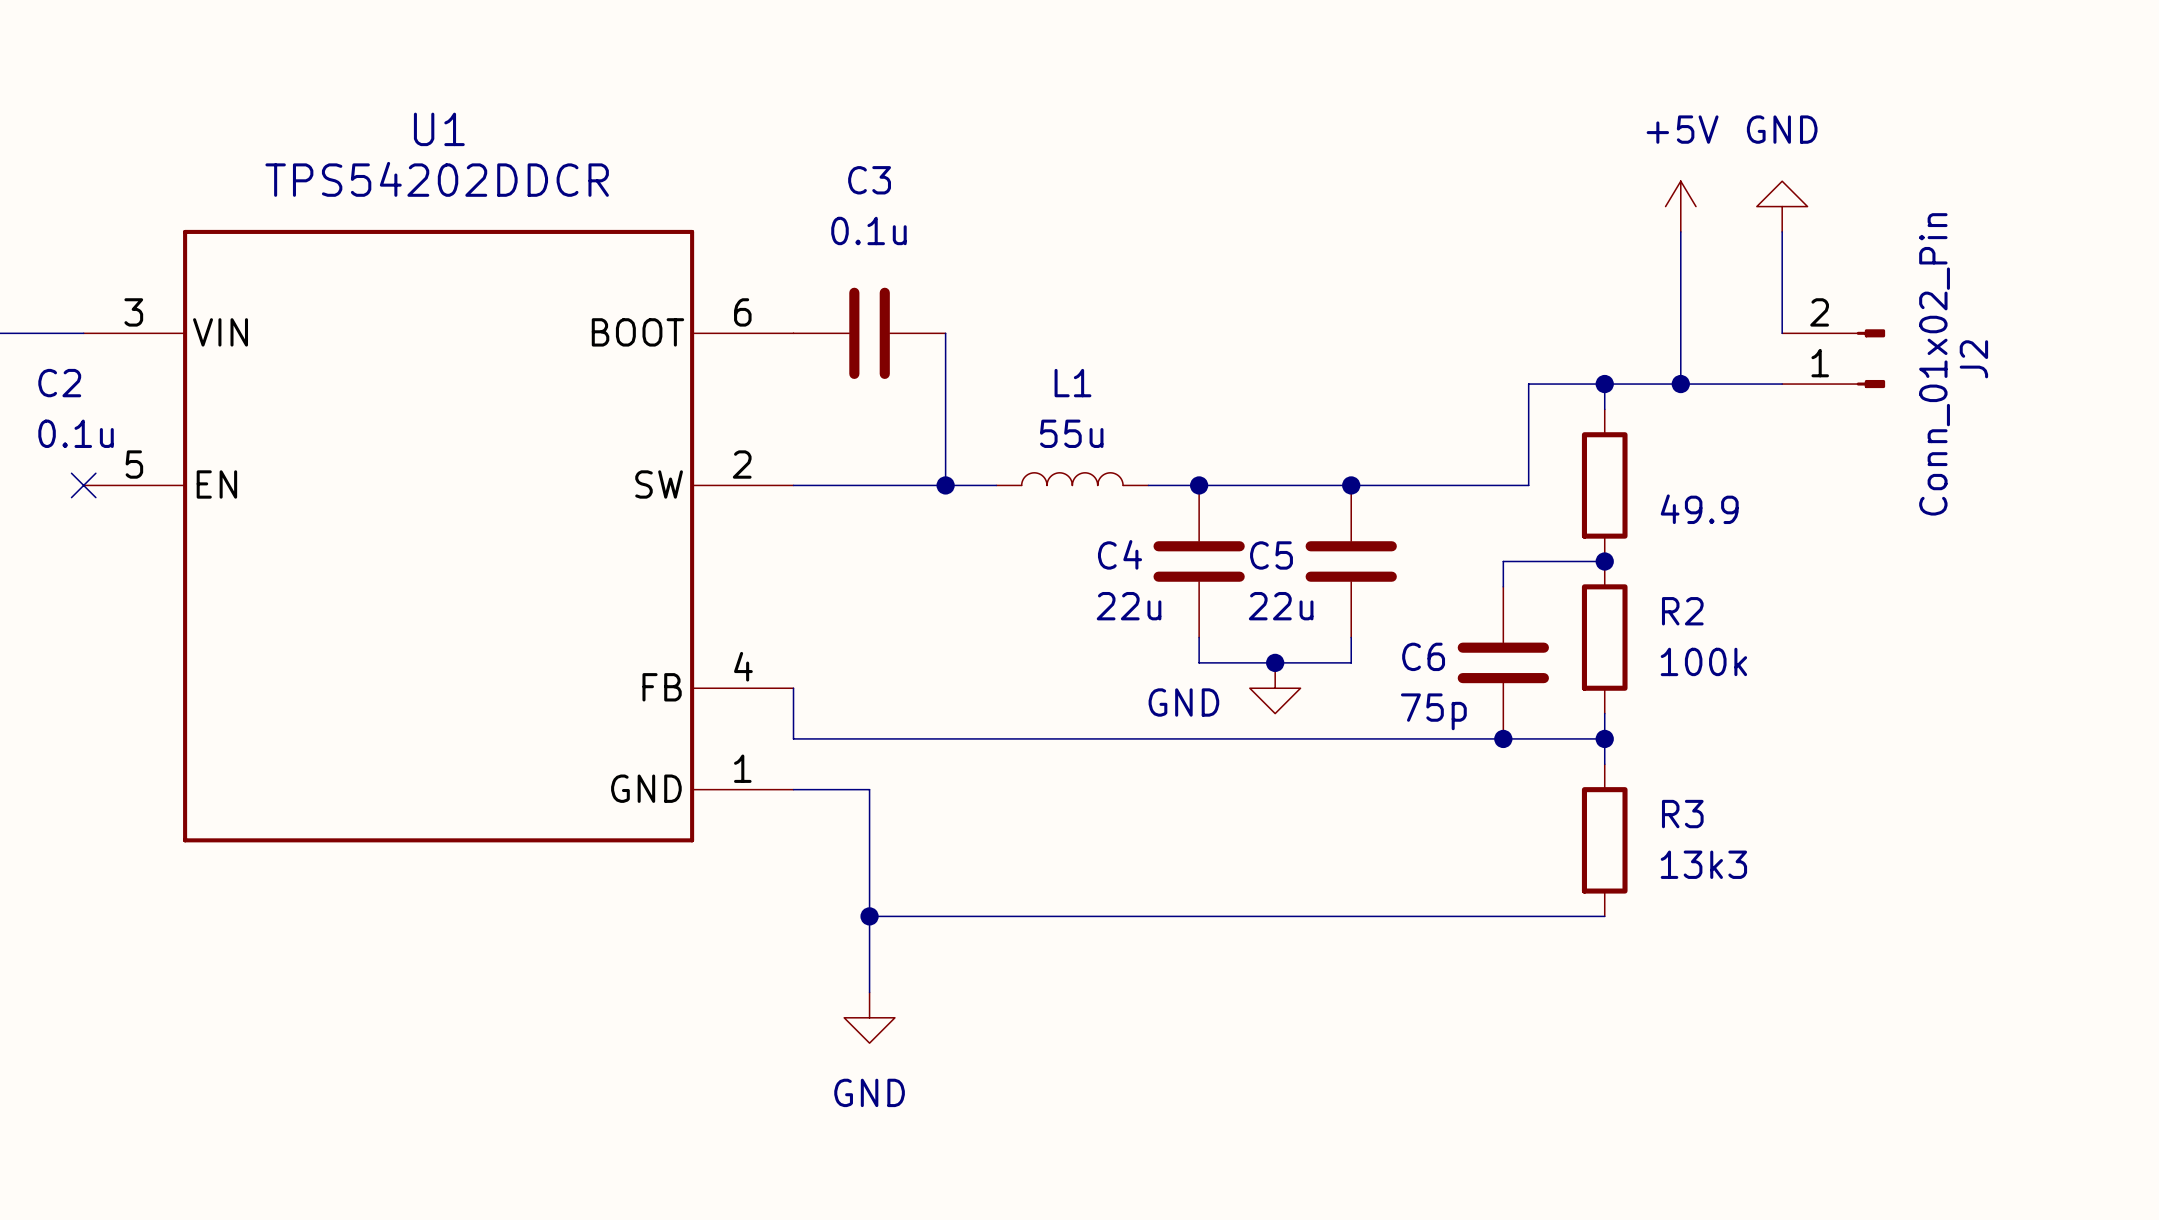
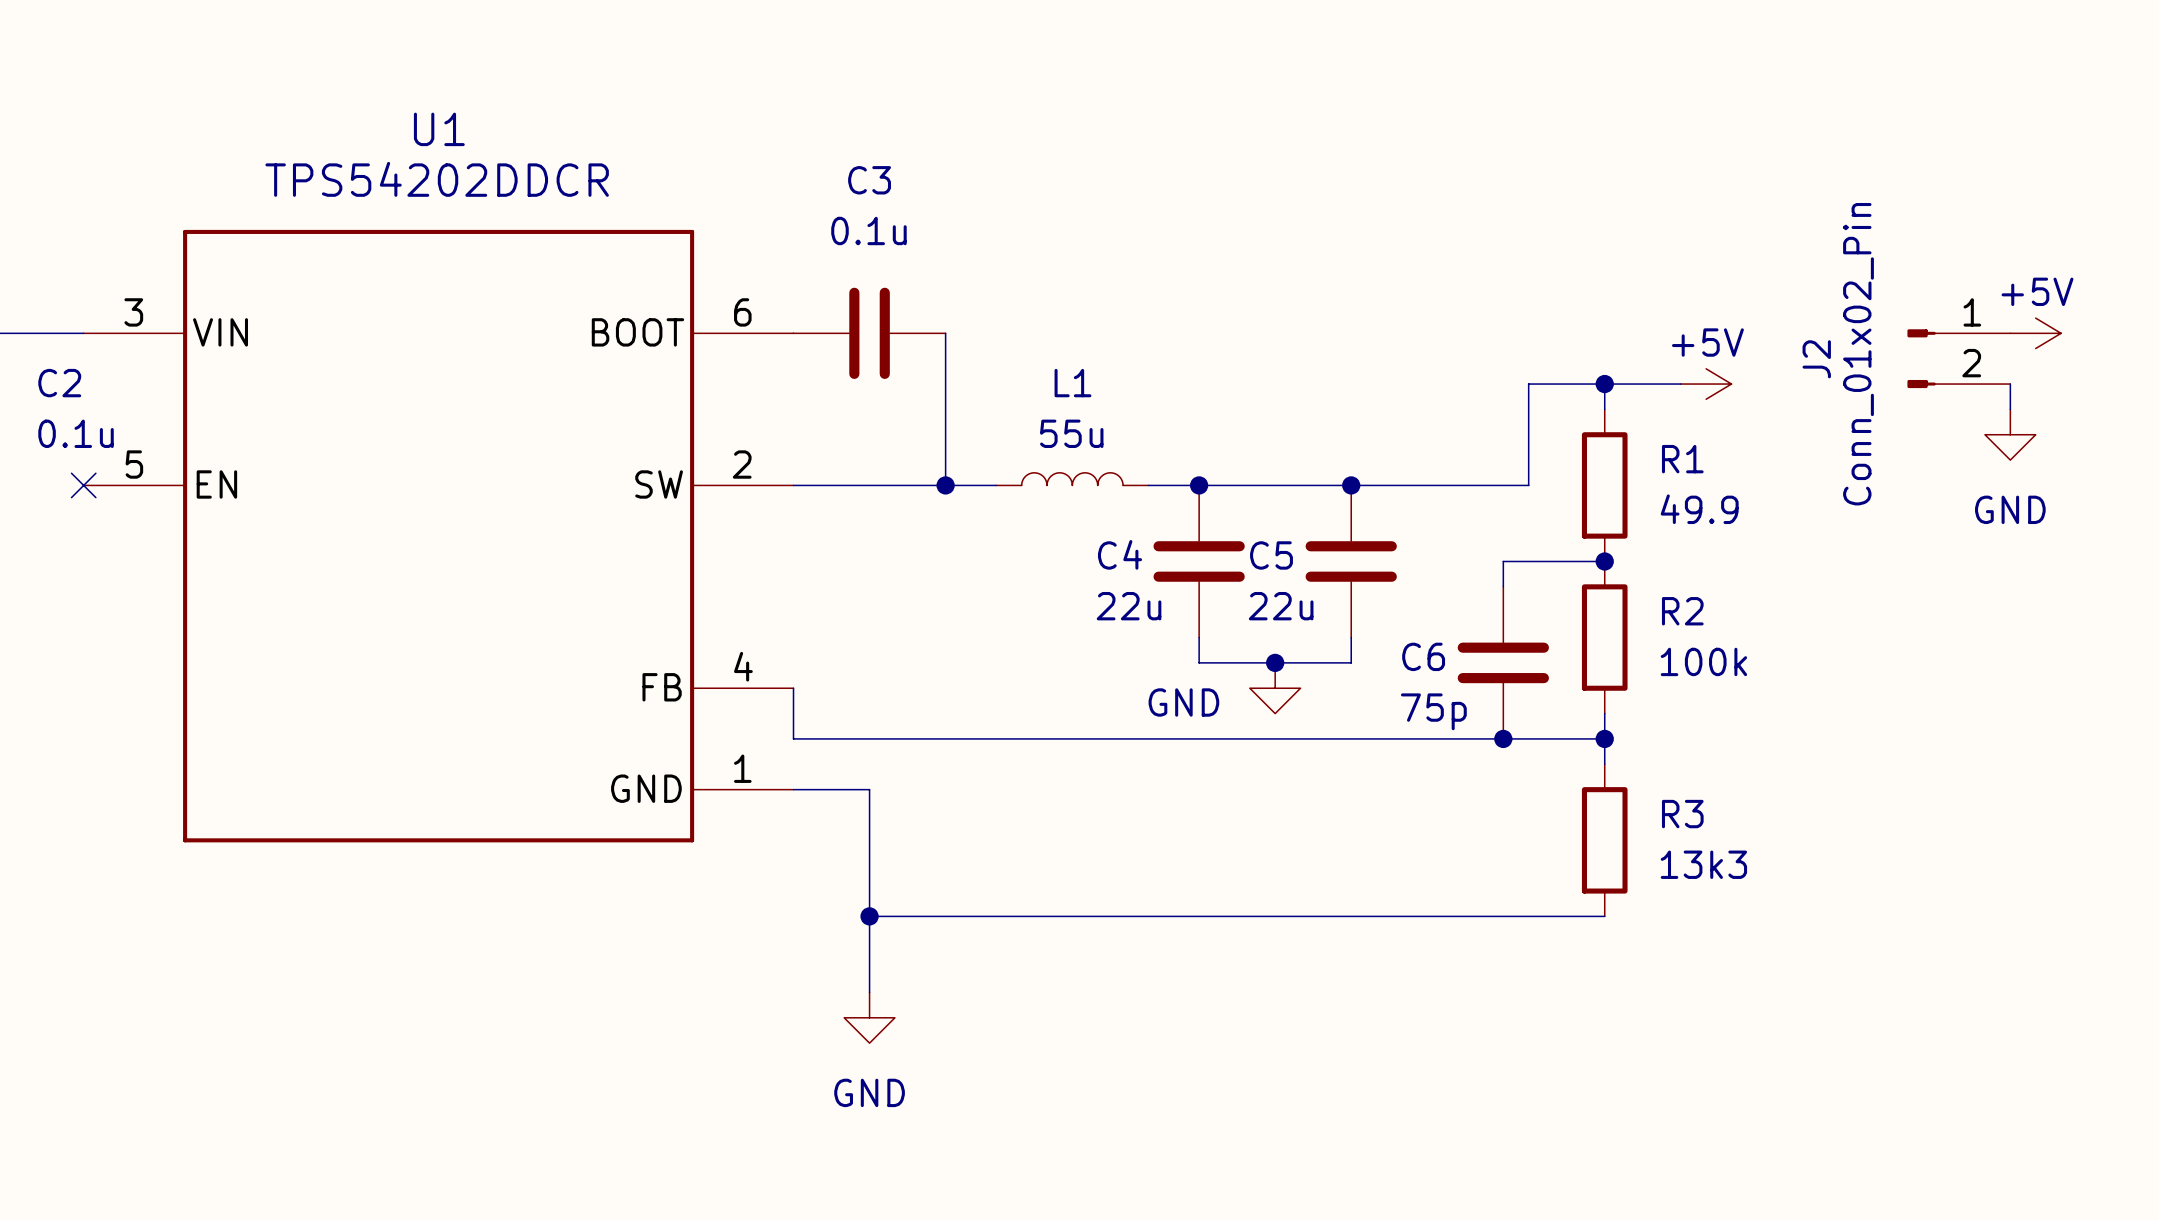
power symbol rotation: 0° (1680, 206) -> 90° clockwise (1706, 384)
power symbol position: +5V (1680, 206) -> +5V (1706, 384)
power symbol rotation: 0° (1782, 206) -> 180° (2010, 434)
power symbol position: GND (1782, 206) -> GND (2010, 434)
wire: (1680, 231) (1680, 384) (1782, 384) -> none
wire: (1782, 231) (1782, 333) -> none
power symbol: none -> +5V (2035, 333)
J2 position: (1833, 358) -> (1958, 358)
J2 rotation: 0° (1870, 358) -> 180° (1921, 358)
junction: (1680, 384) -> none
wire: none -> (2010, 384) (2010, 409)
R1 name: none -> R1 (1682, 459)

